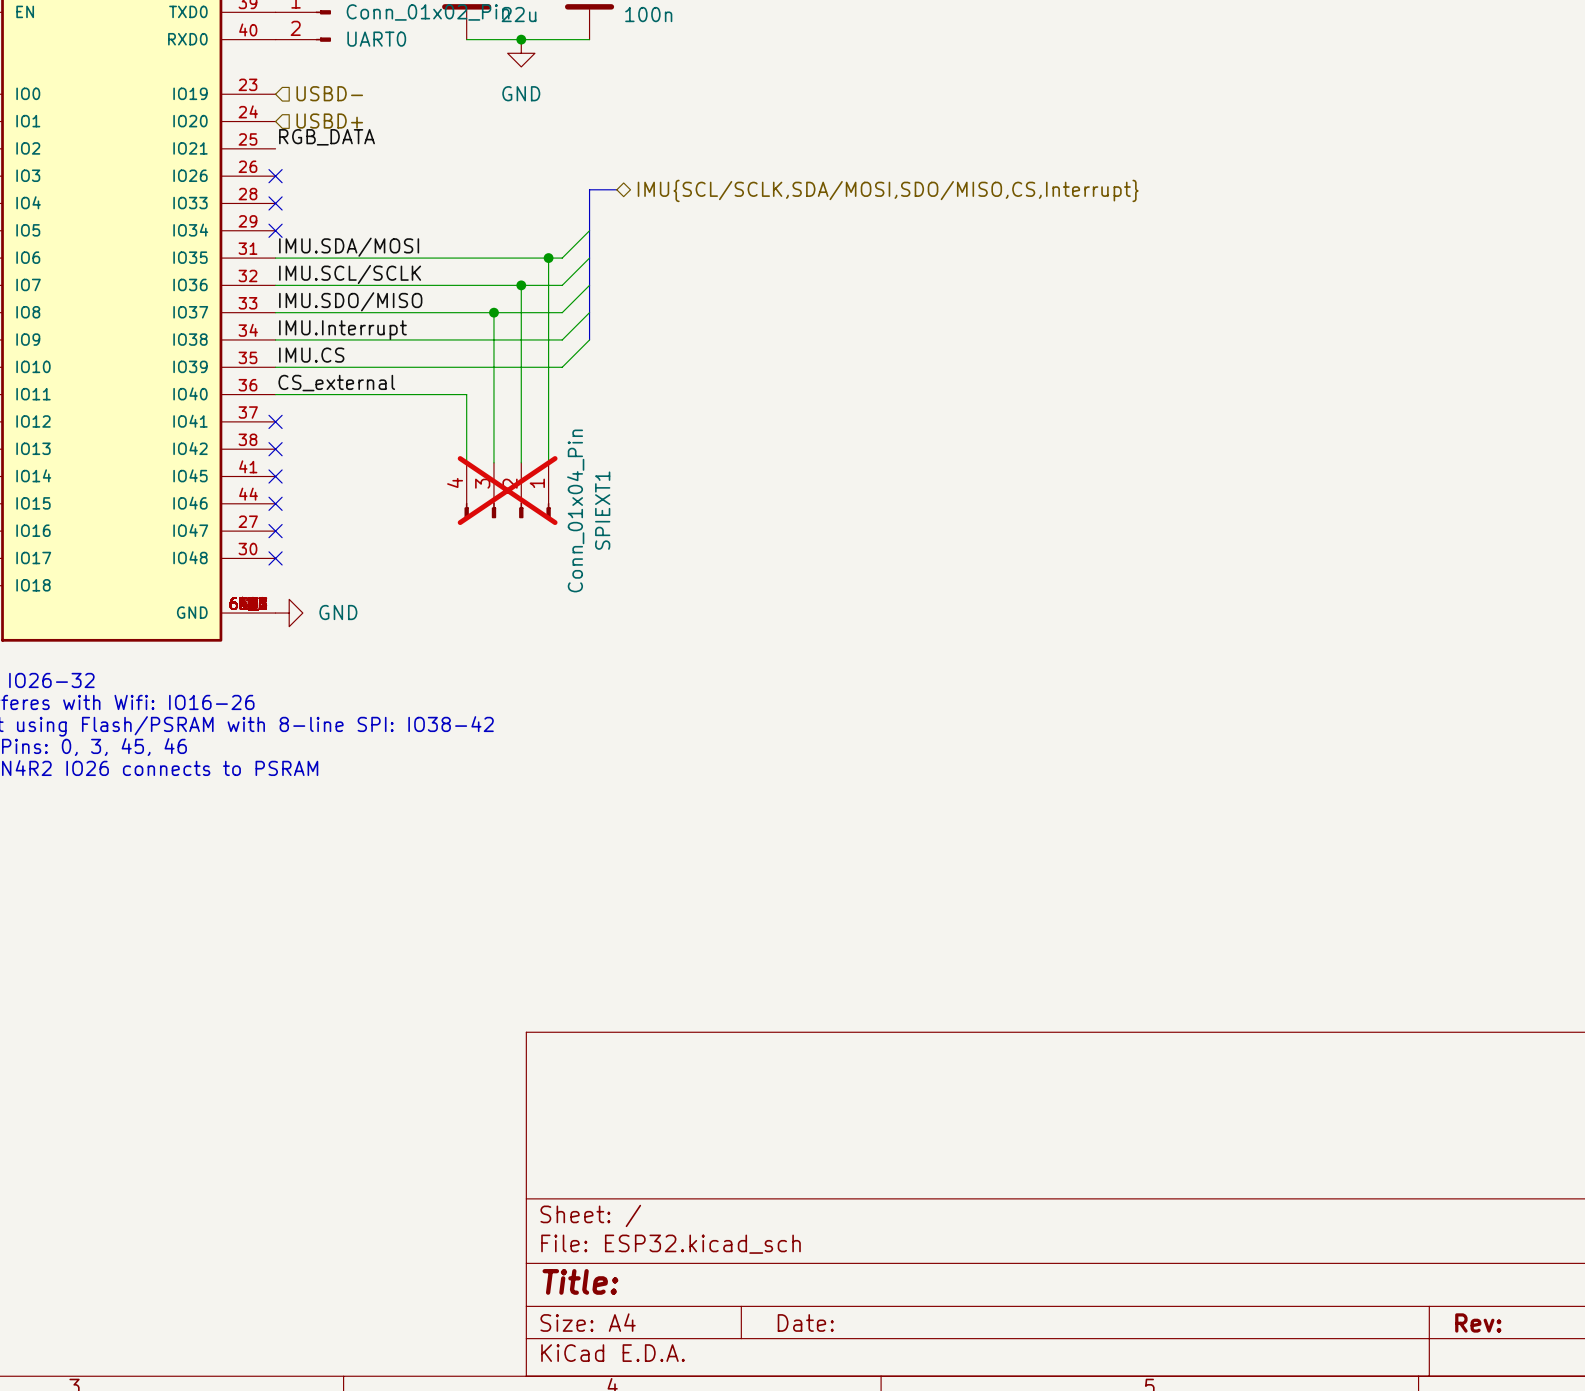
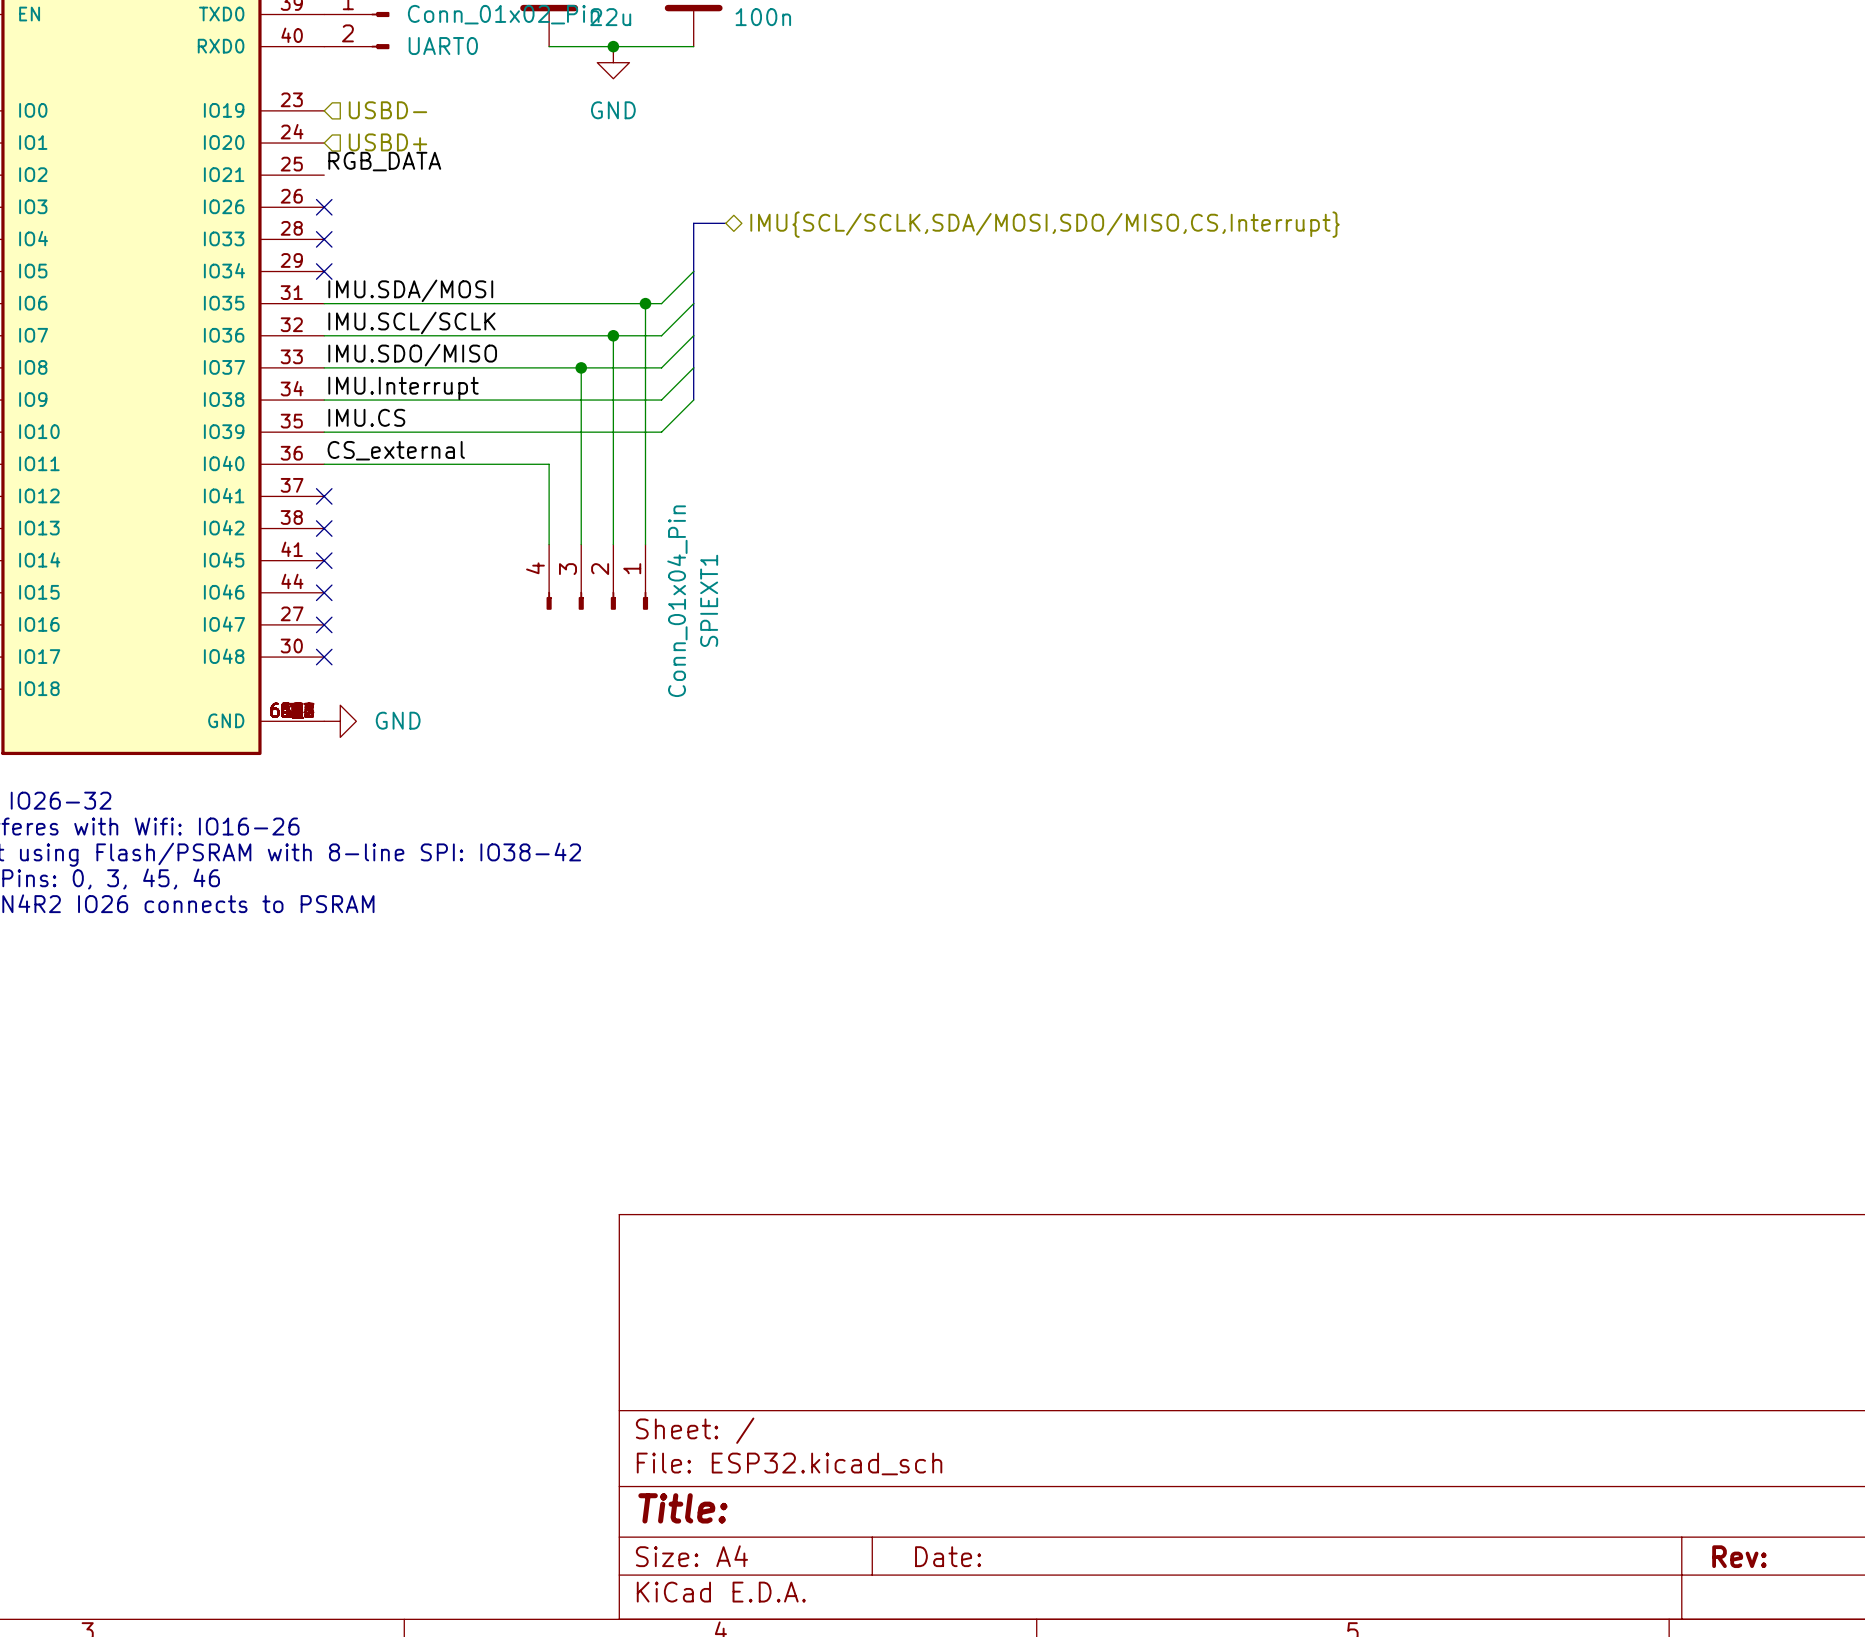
SPIEXT1 do-not-place cross: (507, 490) -> none

